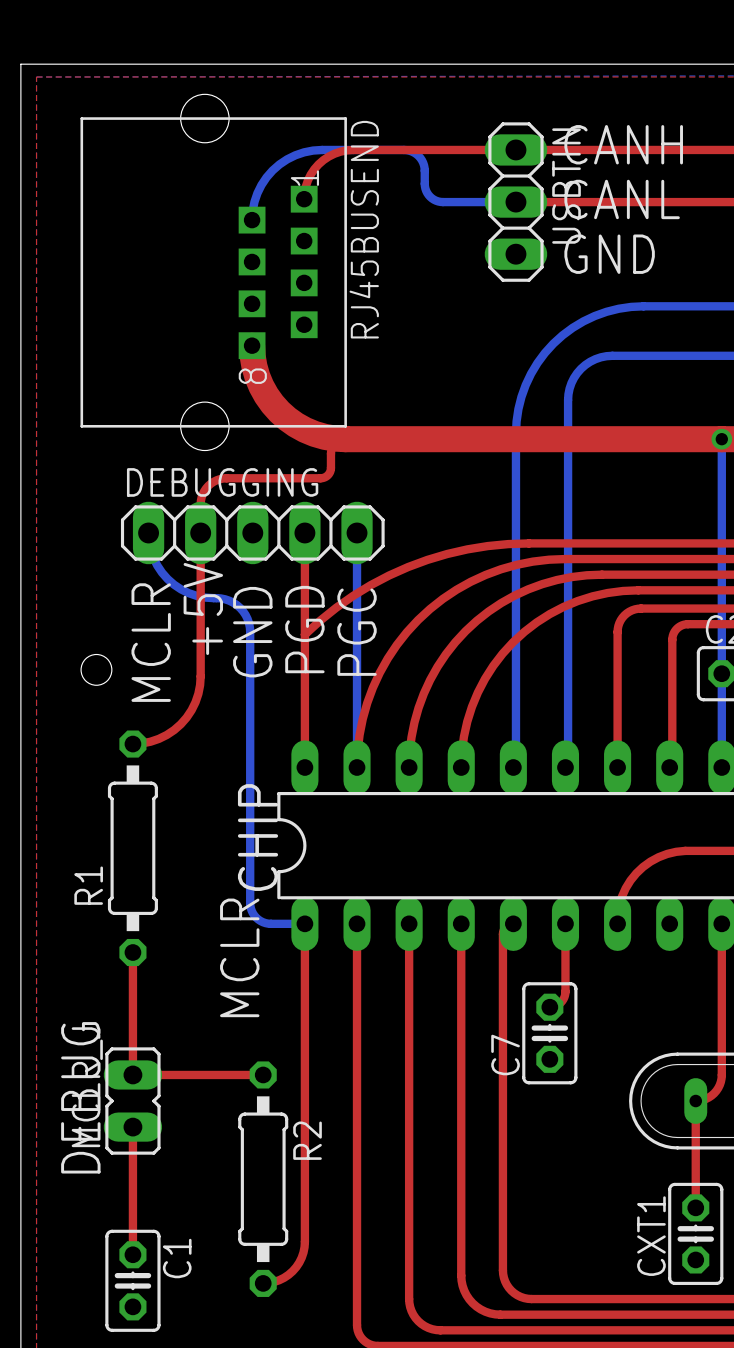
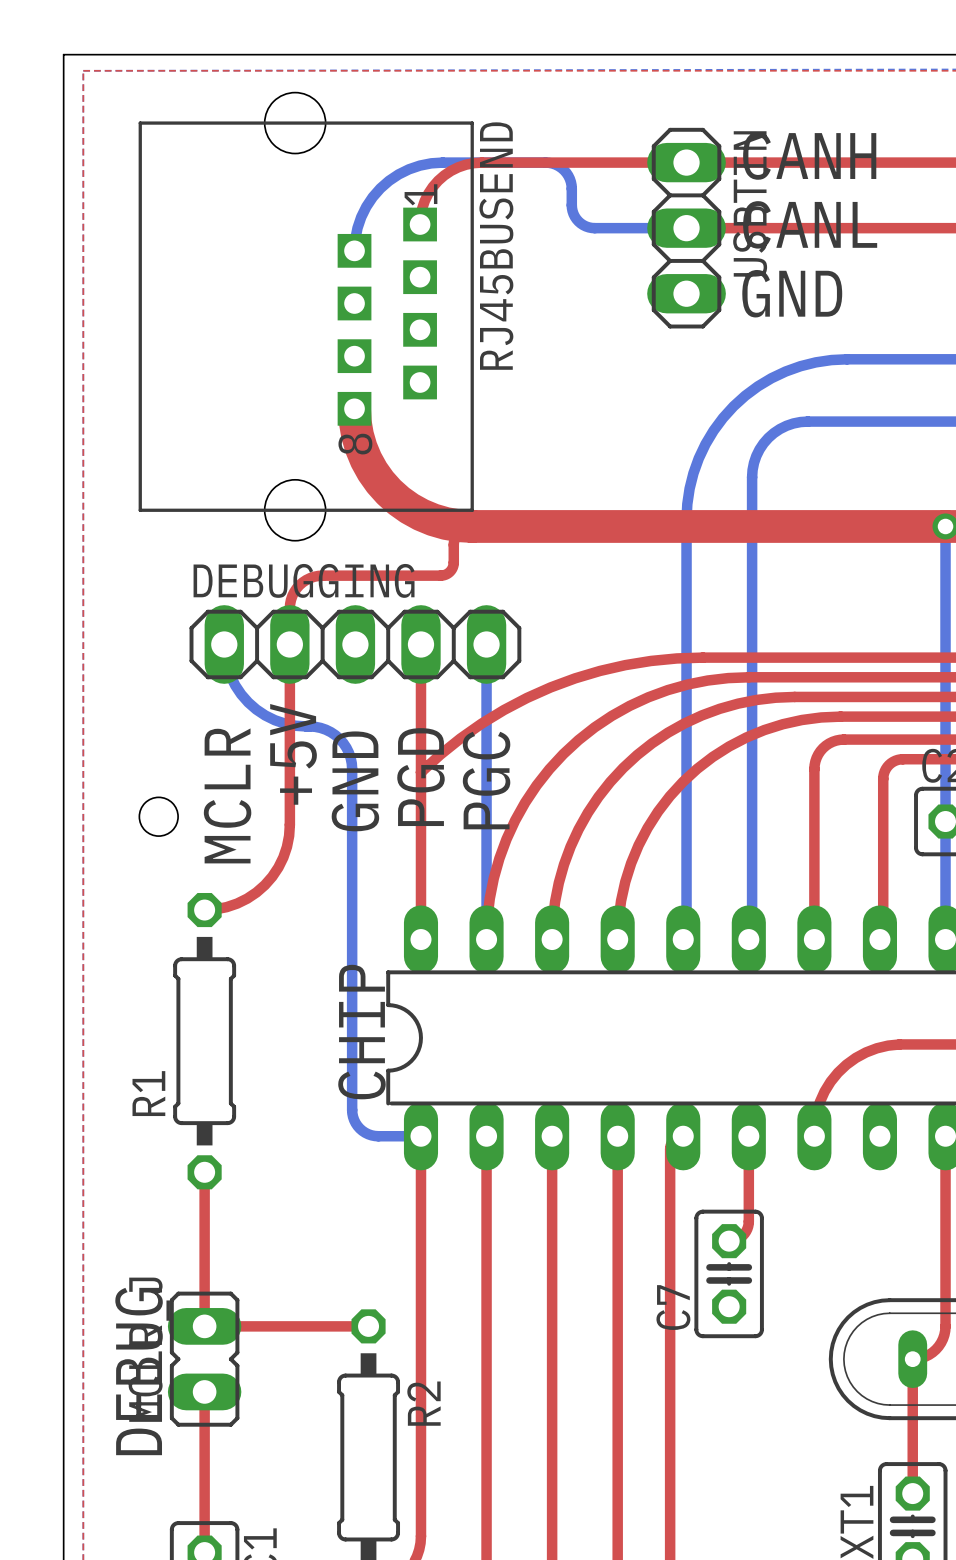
text: MCLR (239, 957) -> none

